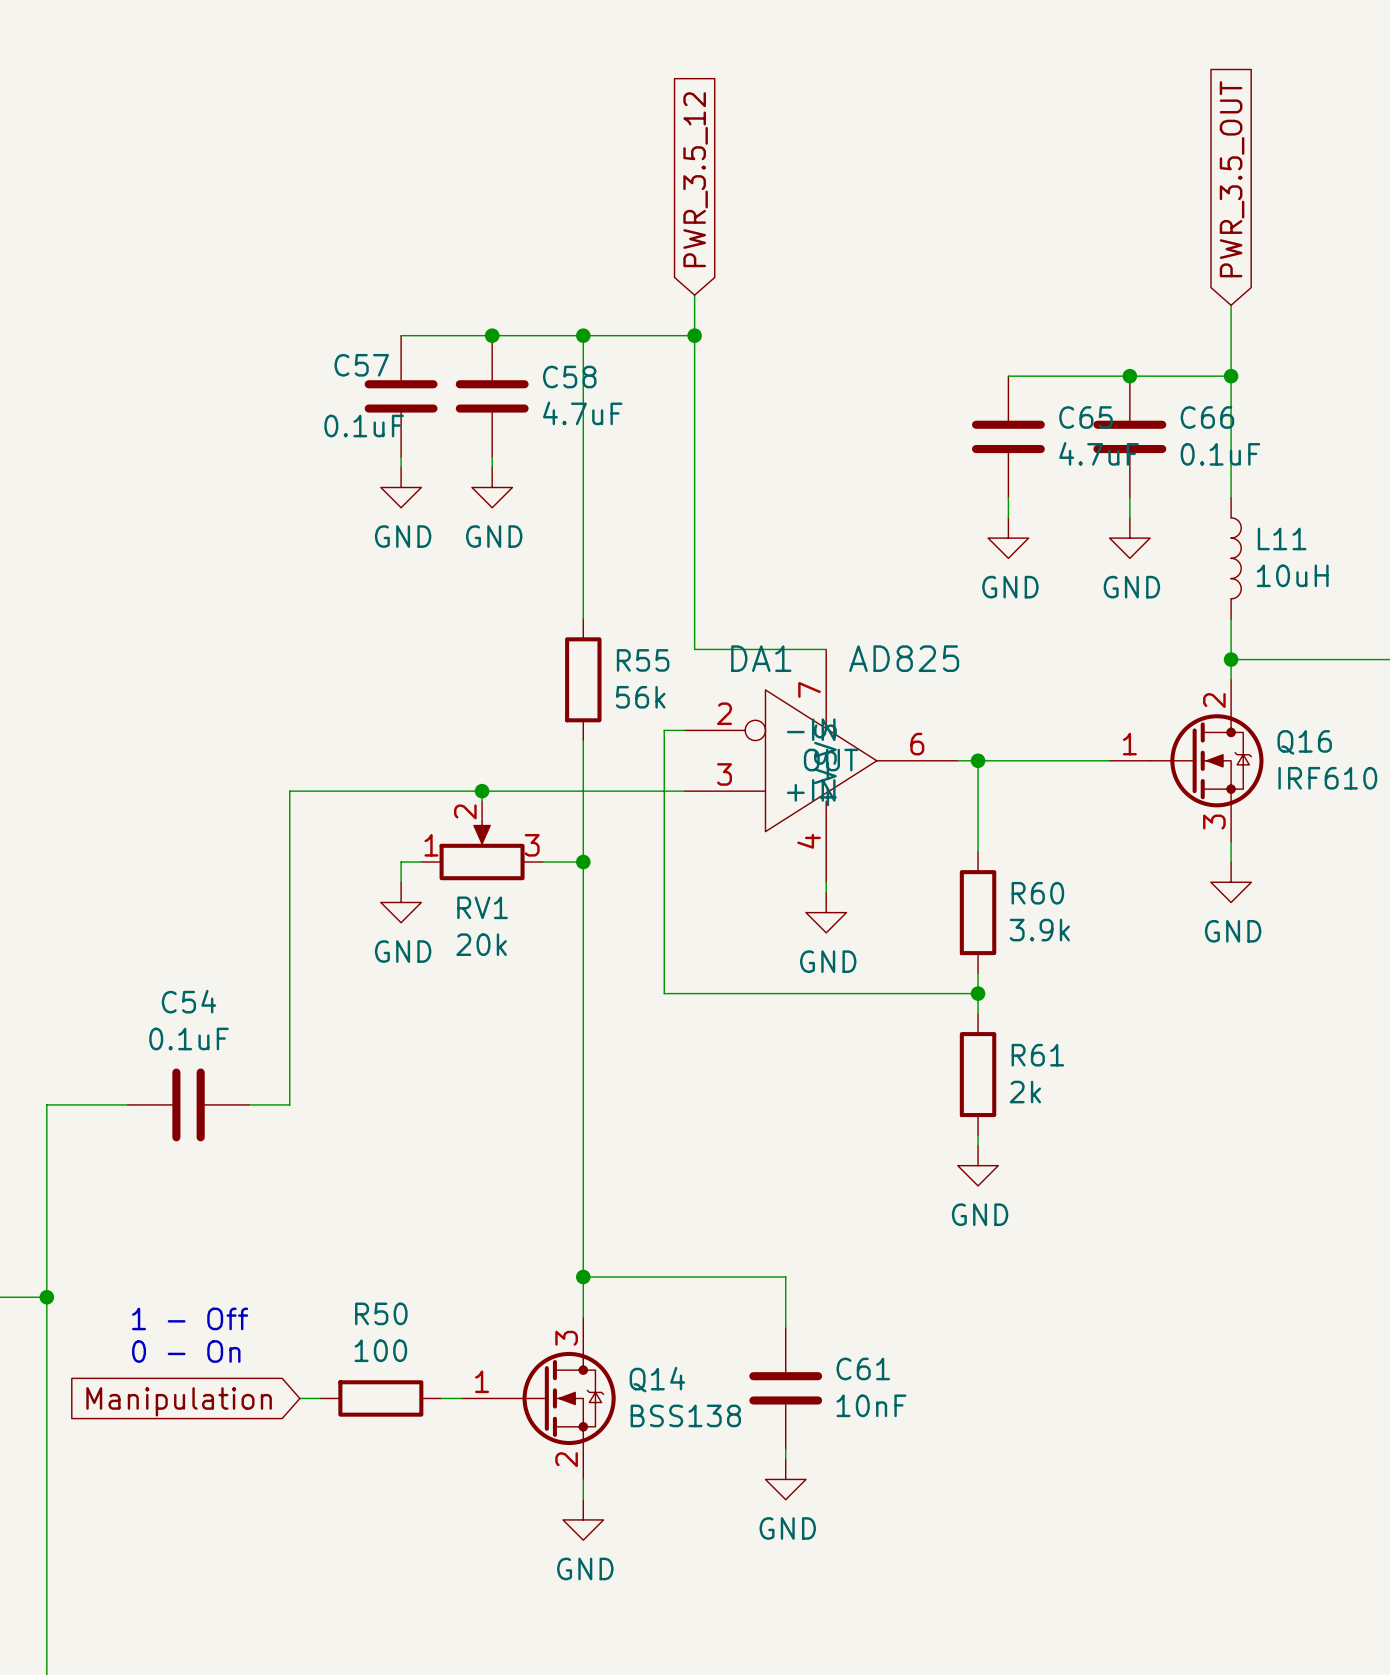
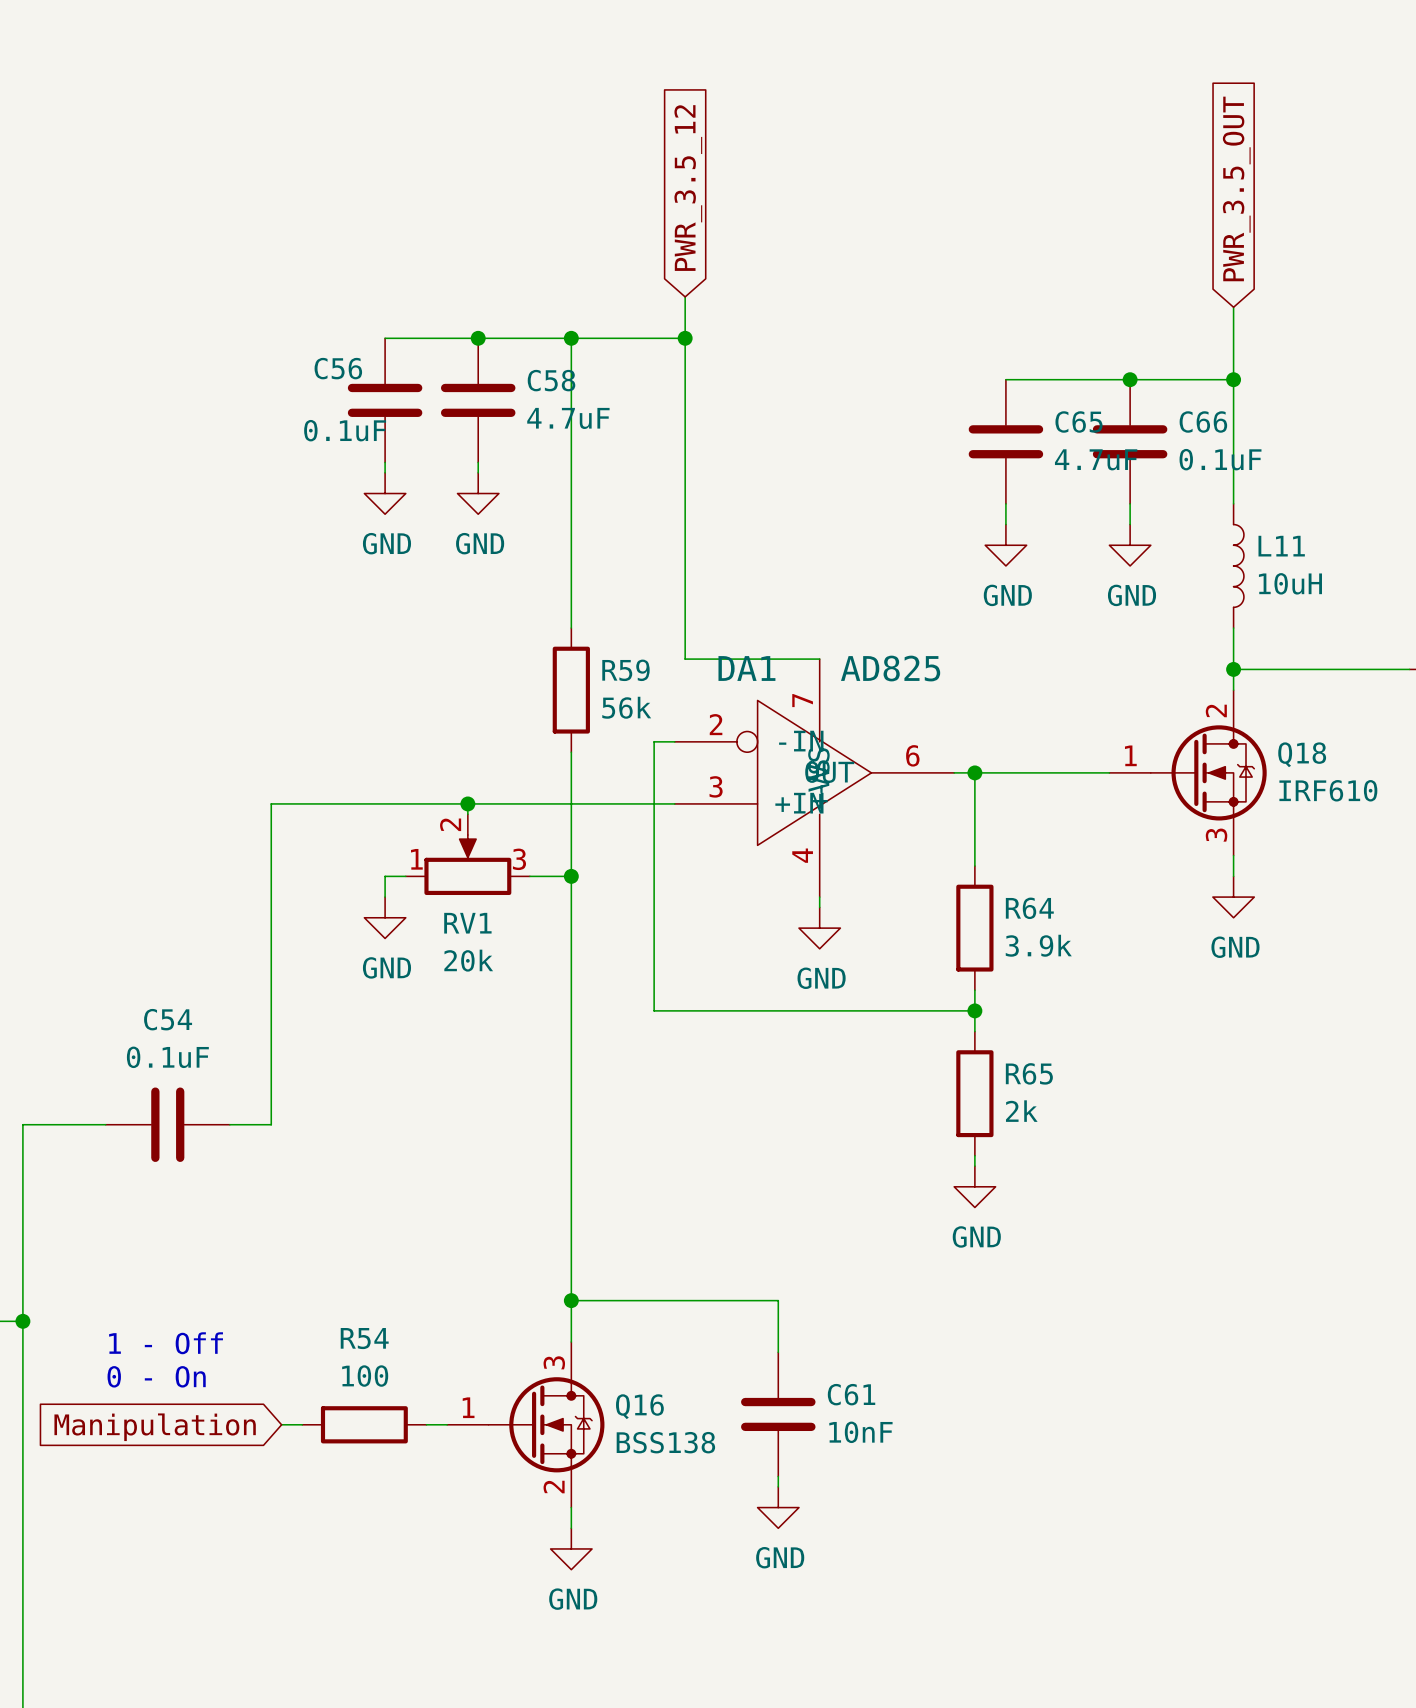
C57 name: C57 (361, 365) -> C56 (338, 368)
R55 name: R55 (643, 660) -> R59 (625, 670)
Q16 name: Q16 (1304, 742) -> Q18 (1302, 754)
R60 name: R60 (1037, 893) -> R64 (1029, 908)
R61 name: R61 (1037, 1055) -> R65 (1029, 1073)
R50 name: R50 (381, 1313) -> R54 (364, 1338)
Q14 name: Q14 (657, 1379) -> Q16 (639, 1406)

